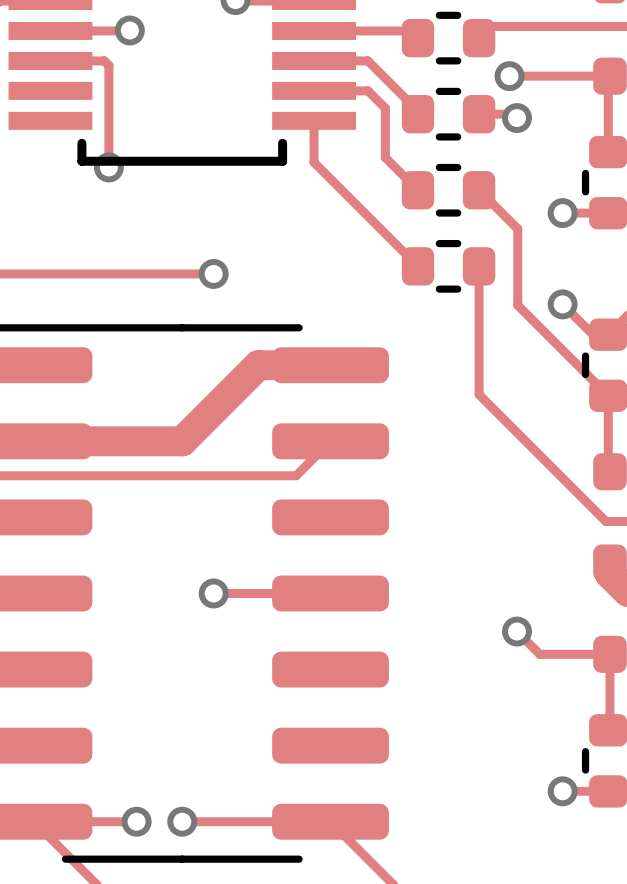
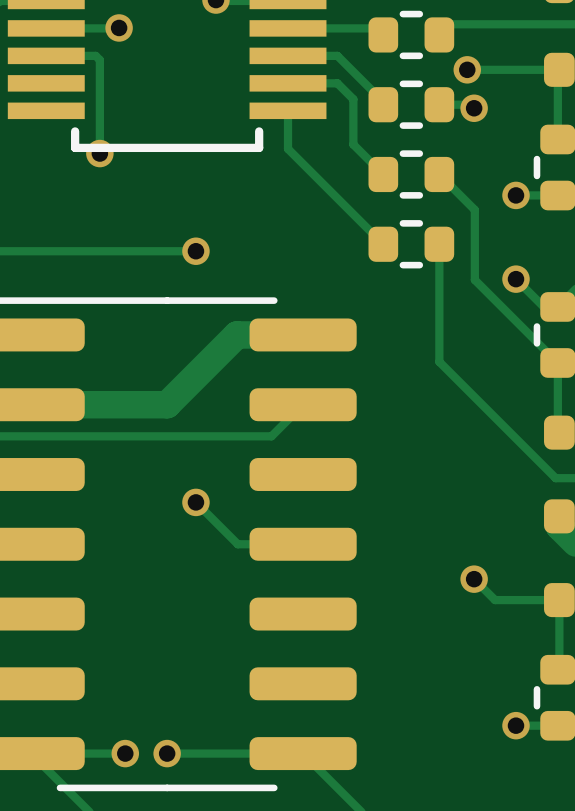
track: (213, 593) (259, 593) -> (195, 502) (237, 544)
via position: (213, 593) -> (195, 502)

